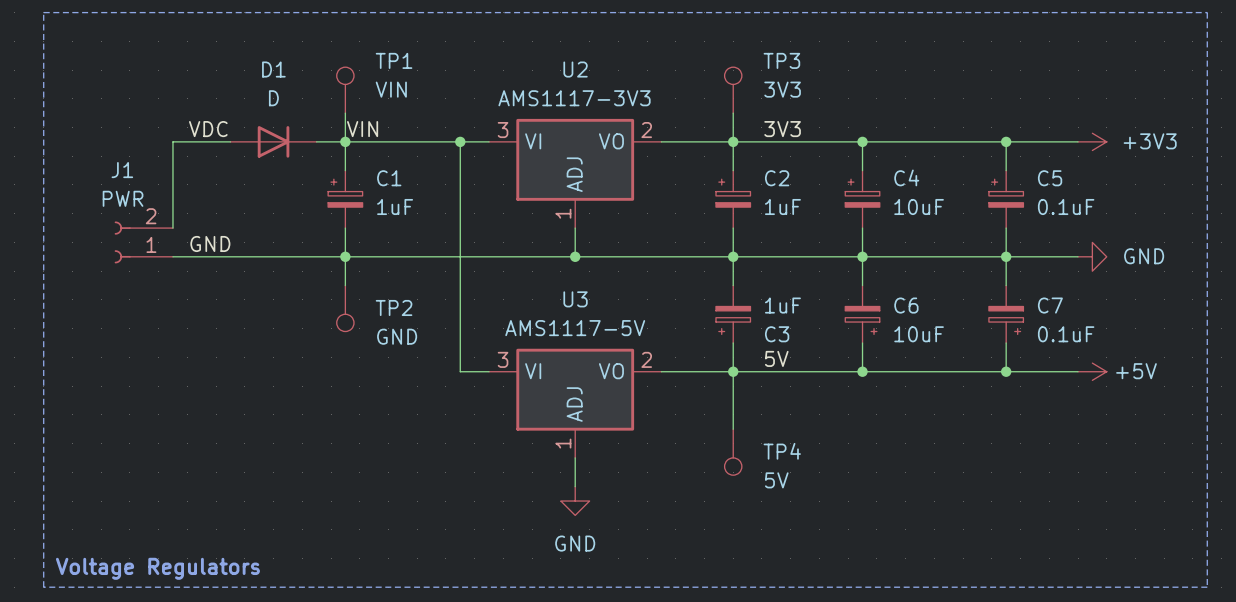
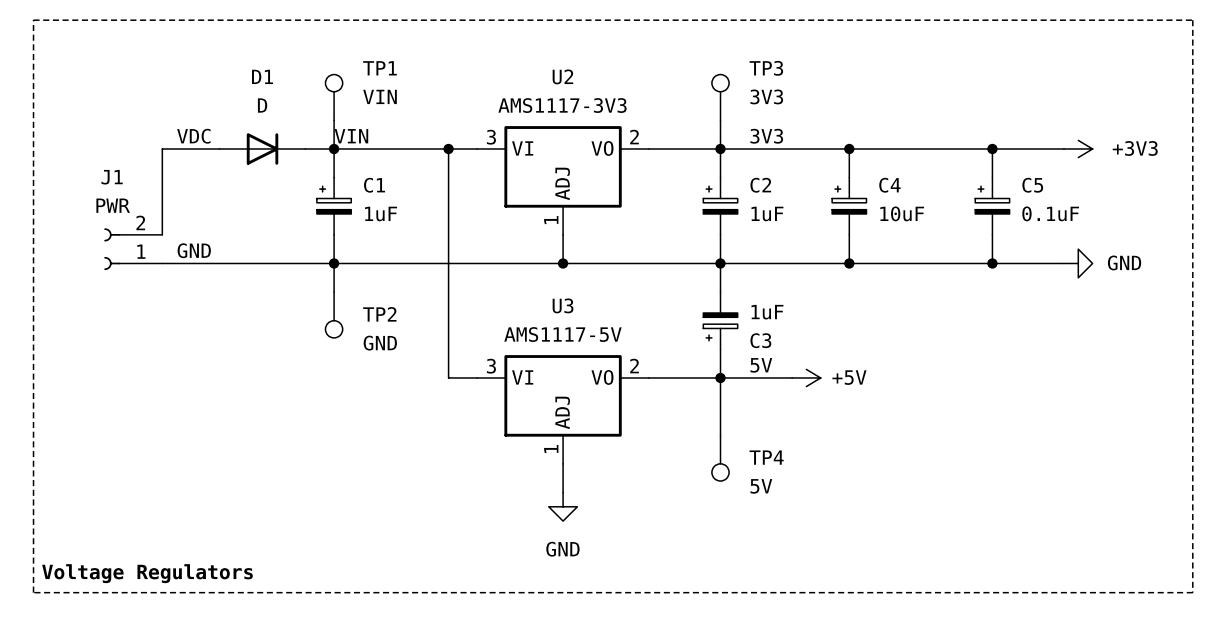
wire: (862, 256) (862, 285) -> none
wire: (1006, 256) (1006, 285) -> none
C6: 10uF (862, 314) -> none
C7: 0.1uF (1006, 314) -> none
wire: (862, 343) (862, 371) -> none
wire: (1006, 343) (1006, 371) -> none
wire: (805, 371) (1078, 371) -> none
junction: (862, 371) -> none
junction: (1006, 371) -> none
power symbol position: +5V (1092, 371) -> +5V (806, 377)

